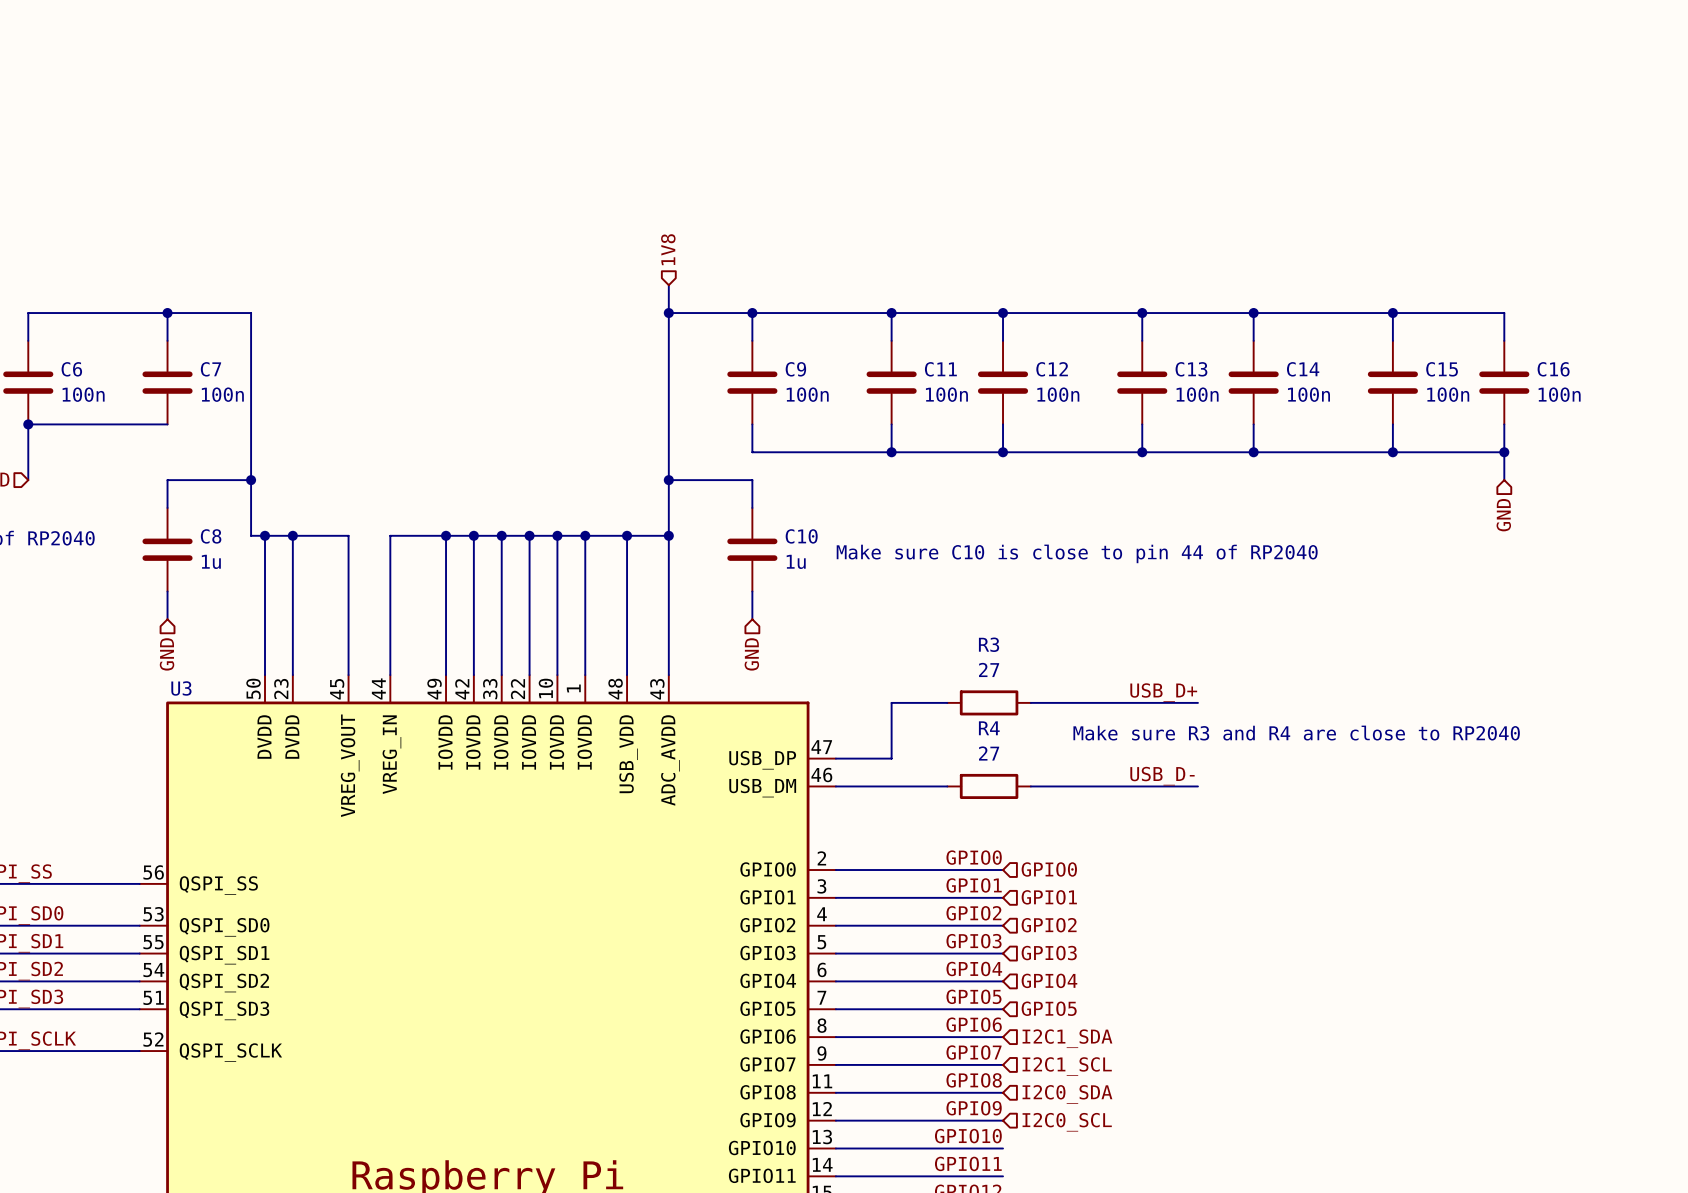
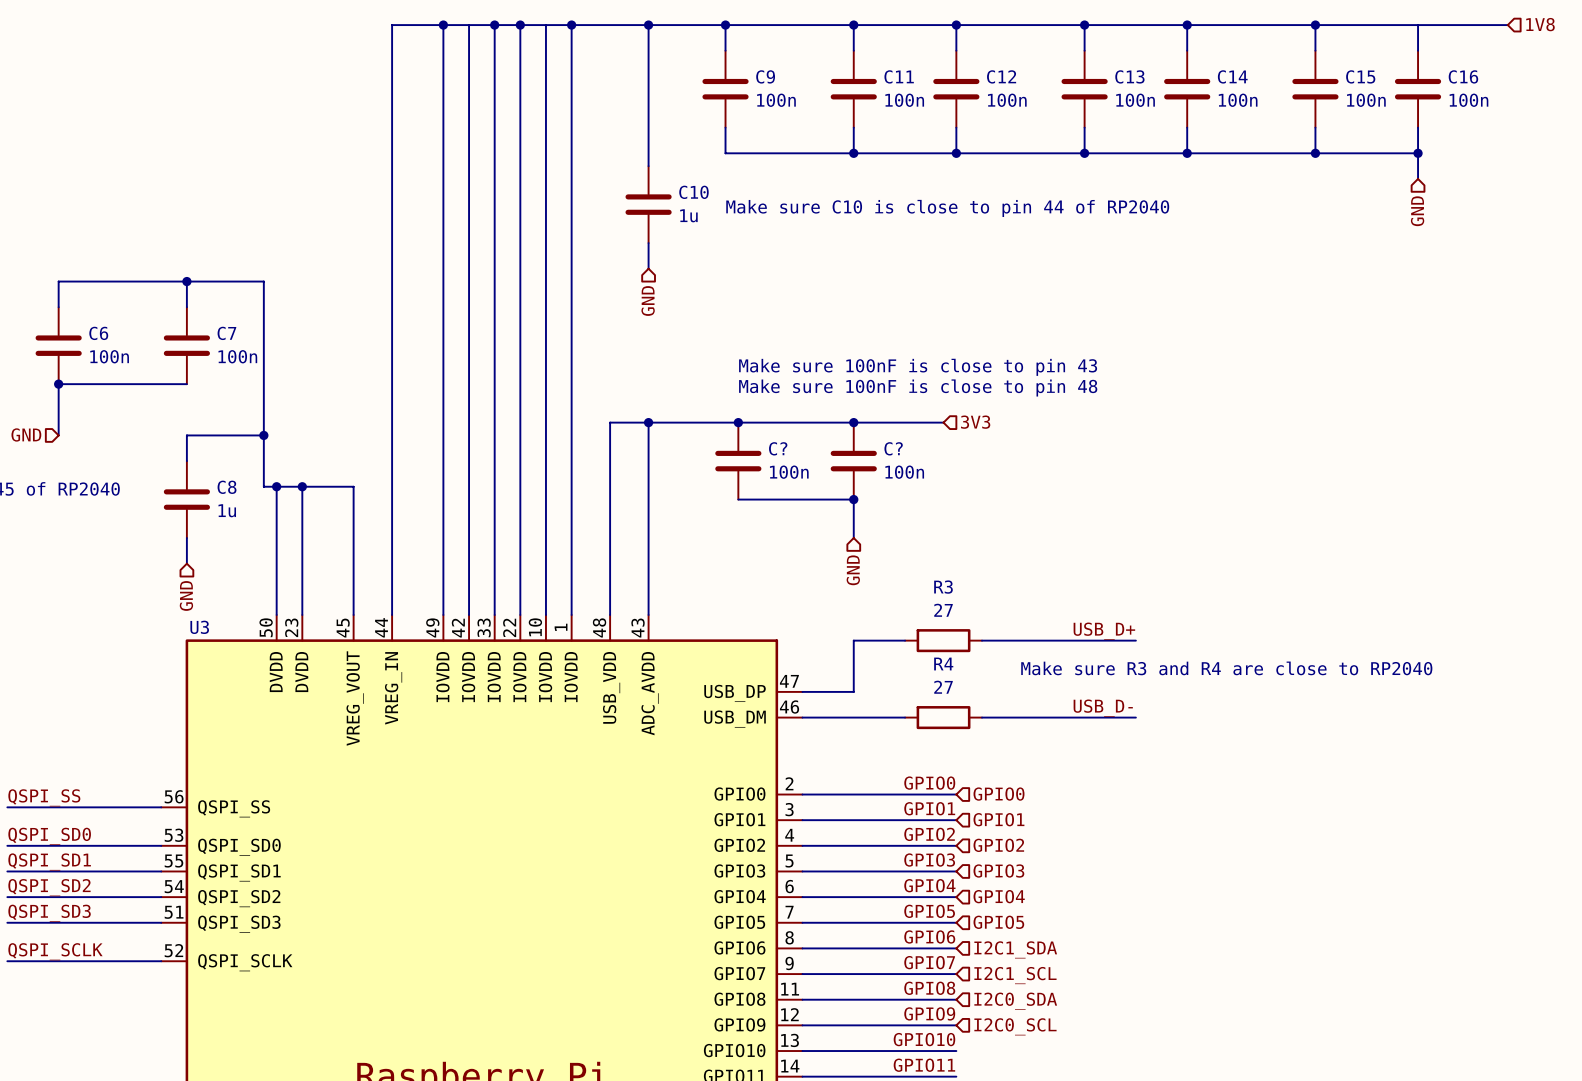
wire: none -> (443, 25) (443, 486)
junction: none -> (443, 25)
wire: none -> (469, 25) (469, 486)
wire: none -> (494, 25) (494, 486)
junction: none -> (494, 25)
wire: none -> (520, 25) (520, 486)
junction: none -> (520, 25)
wire: none -> (545, 25) (545, 486)
wire: none -> (571, 25) (571, 486)
junction: none -> (571, 25)
wire: none -> (648, 25) (648, 166)
junction: none -> (648, 25)
wire: none -> (725, 25) (725, 50)
junction: none -> (725, 25)
wire: none -> (853, 25) (853, 50)
junction: none -> (853, 25)
wire: none -> (956, 25) (956, 50)
junction: none -> (956, 25)
wire: none -> (1084, 25) (1084, 50)
junction: none -> (1084, 25)
wire: none -> (1187, 25) (1187, 50)
junction: none -> (1187, 25)
wire: none -> (1315, 25) (1315, 50)
junction: none -> (1315, 25)
wire: none -> (1418, 25) (1418, 50)
hierarchical label: none -> 1V8 (1540, 24)
wire: none -> (725, 127) (725, 153) (1418, 153)
wire: none -> (1418, 127) (1418, 178)
junction: none -> (853, 153)
junction: none -> (956, 153)
junction: none -> (1084, 153)
junction: none -> (1187, 153)
junction: none -> (1315, 153)
junction: none -> (1418, 153)
text: none -> Make sure C10 is close to pin 44 of RP2040 (947, 208)
hierarchical label: none -> GND (1417, 211)
hierarchical label: 1V8 (668, 249) -> none
wire: none -> (648, 243) (648, 255)
wire: (668, 299) (668, 466) -> none
wire: (668, 313) (1504, 313) (1504, 340) -> none
junction: (668, 313) -> none
wire: (752, 313) (752, 340) -> none
junction: (752, 313) -> none
wire: (891, 313) (891, 340) -> (853, 127) (853, 153)
junction: (891, 313) -> none
wire: (1003, 313) (1003, 340) -> (956, 127) (956, 153)
junction: (1003, 313) -> none
wire: (1142, 313) (1142, 340) -> (1084, 127) (1084, 153)
junction: (1142, 313) -> none
wire: (1253, 313) (1253, 340) -> (1187, 127) (1187, 153)
junction: (1253, 313) -> none
wire: (1392, 313) (1392, 340) -> (1315, 127) (1315, 153)
junction: (1392, 313) -> none
hierarchical label: none -> GND (648, 301)
C9 position: (752, 382) -> (725, 89)
C11 position: (891, 382) -> (853, 89)
C12 position: (1003, 382) -> (956, 89)
C13 position: (1142, 382) -> (1084, 89)
C14 position: (1253, 382) -> (1187, 89)
C15 position: (1392, 382) -> (1315, 89)
C16 position: (1504, 382) -> (1418, 89)
text: none -> Make sure 100nF is close to pin 43 (918, 367)
wire: (752, 424) (752, 452) (1504, 452) -> none
wire: (891, 424) (891, 452) -> none
wire: (1003, 424) (1003, 452) -> none
wire: (1142, 424) (1142, 452) -> none
wire: (1253, 424) (1253, 452) -> none
wire: (1392, 424) (1392, 452) -> none
wire: (1504, 424) (1504, 480) -> none
text: none -> Make sure 100nF is close to pin 48 (918, 387)
junction position: (891, 452) -> (853, 422)
junction: (1003, 452) -> none
junction: (1142, 452) -> none
junction: (1253, 452) -> none
junction: (1392, 452) -> none
junction: (1504, 452) -> none
hierarchical label: none -> 3V3 (975, 422)
junction: none -> (738, 422)
wire: none -> (943, 422) (610, 422) (610, 486)
wire: (668, 480) (752, 480) (752, 507) -> none
junction position: (668, 480) -> (648, 422)
C?: none -> 100n (738, 461)
C?: none -> 100n (853, 461)
hierarchical label: GND (1503, 515) -> none
wire: (390, 535) (668, 535) -> (392, 486) (392, 25) (1507, 25)
junction: (446, 535) -> none
junction: (473, 535) -> none
junction: (501, 535) -> none
junction: (529, 535) -> none
junction: (557, 535) -> none
junction: (585, 535) -> none
junction: (627, 535) -> none
junction: (668, 535) -> none
C10 position: (752, 549) -> (648, 204)
wire: none -> (738, 499) (853, 499) (853, 538)
junction: none -> (853, 499)
text: Make sure C10 is close to pin 44 of RP2040 (1077, 553) -> none
wire: (752, 591) (752, 619) -> none
hierarchical label position: GND (751, 654) -> GND (853, 570)

